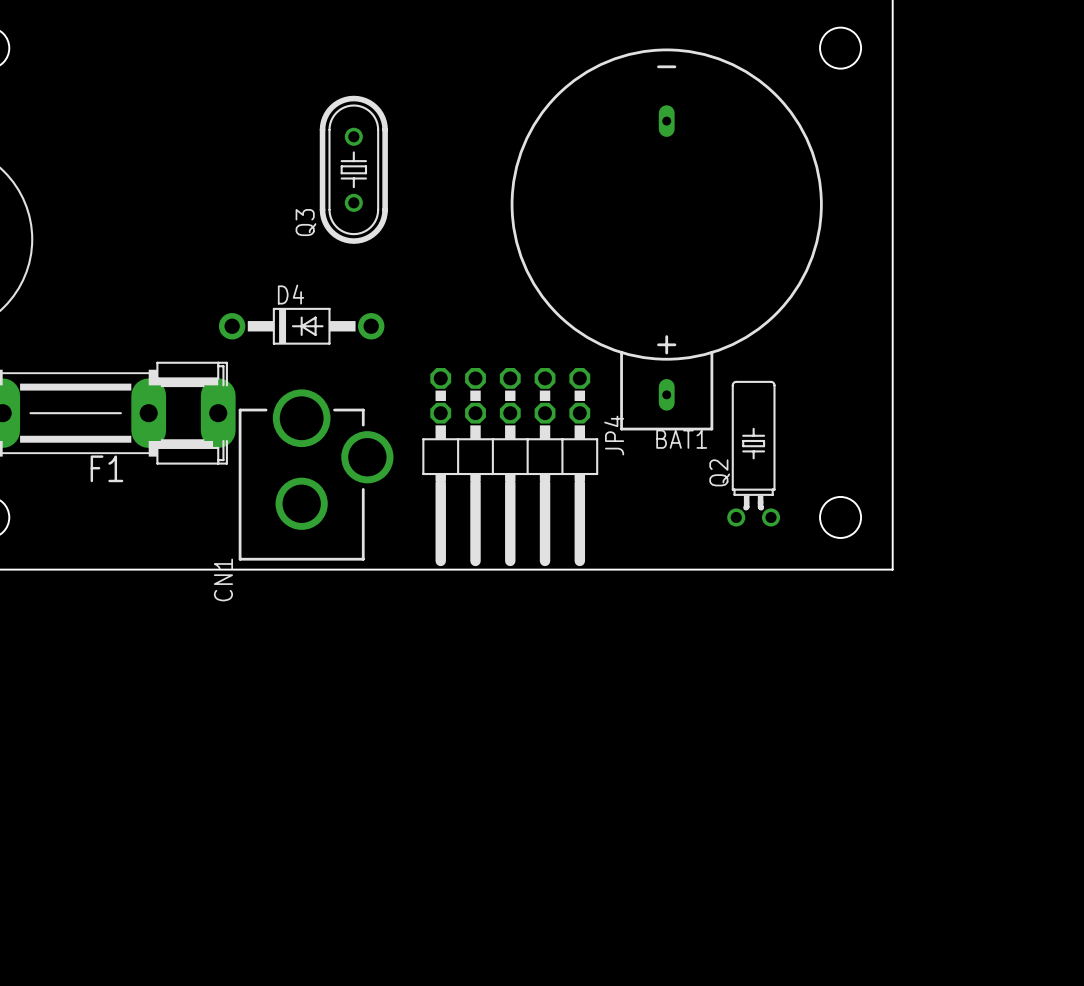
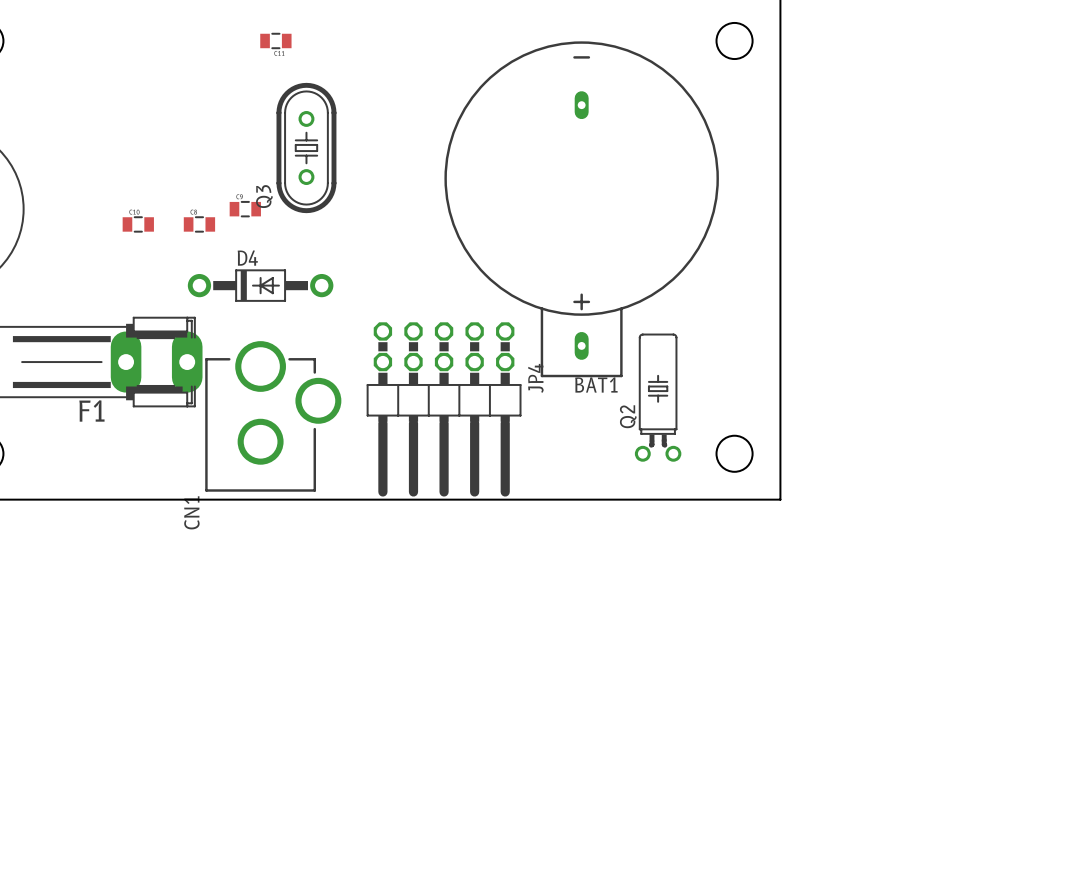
part: none -> (275, 40)
part: none -> (245, 209)
part: none -> (138, 224)
part: none -> (199, 224)

